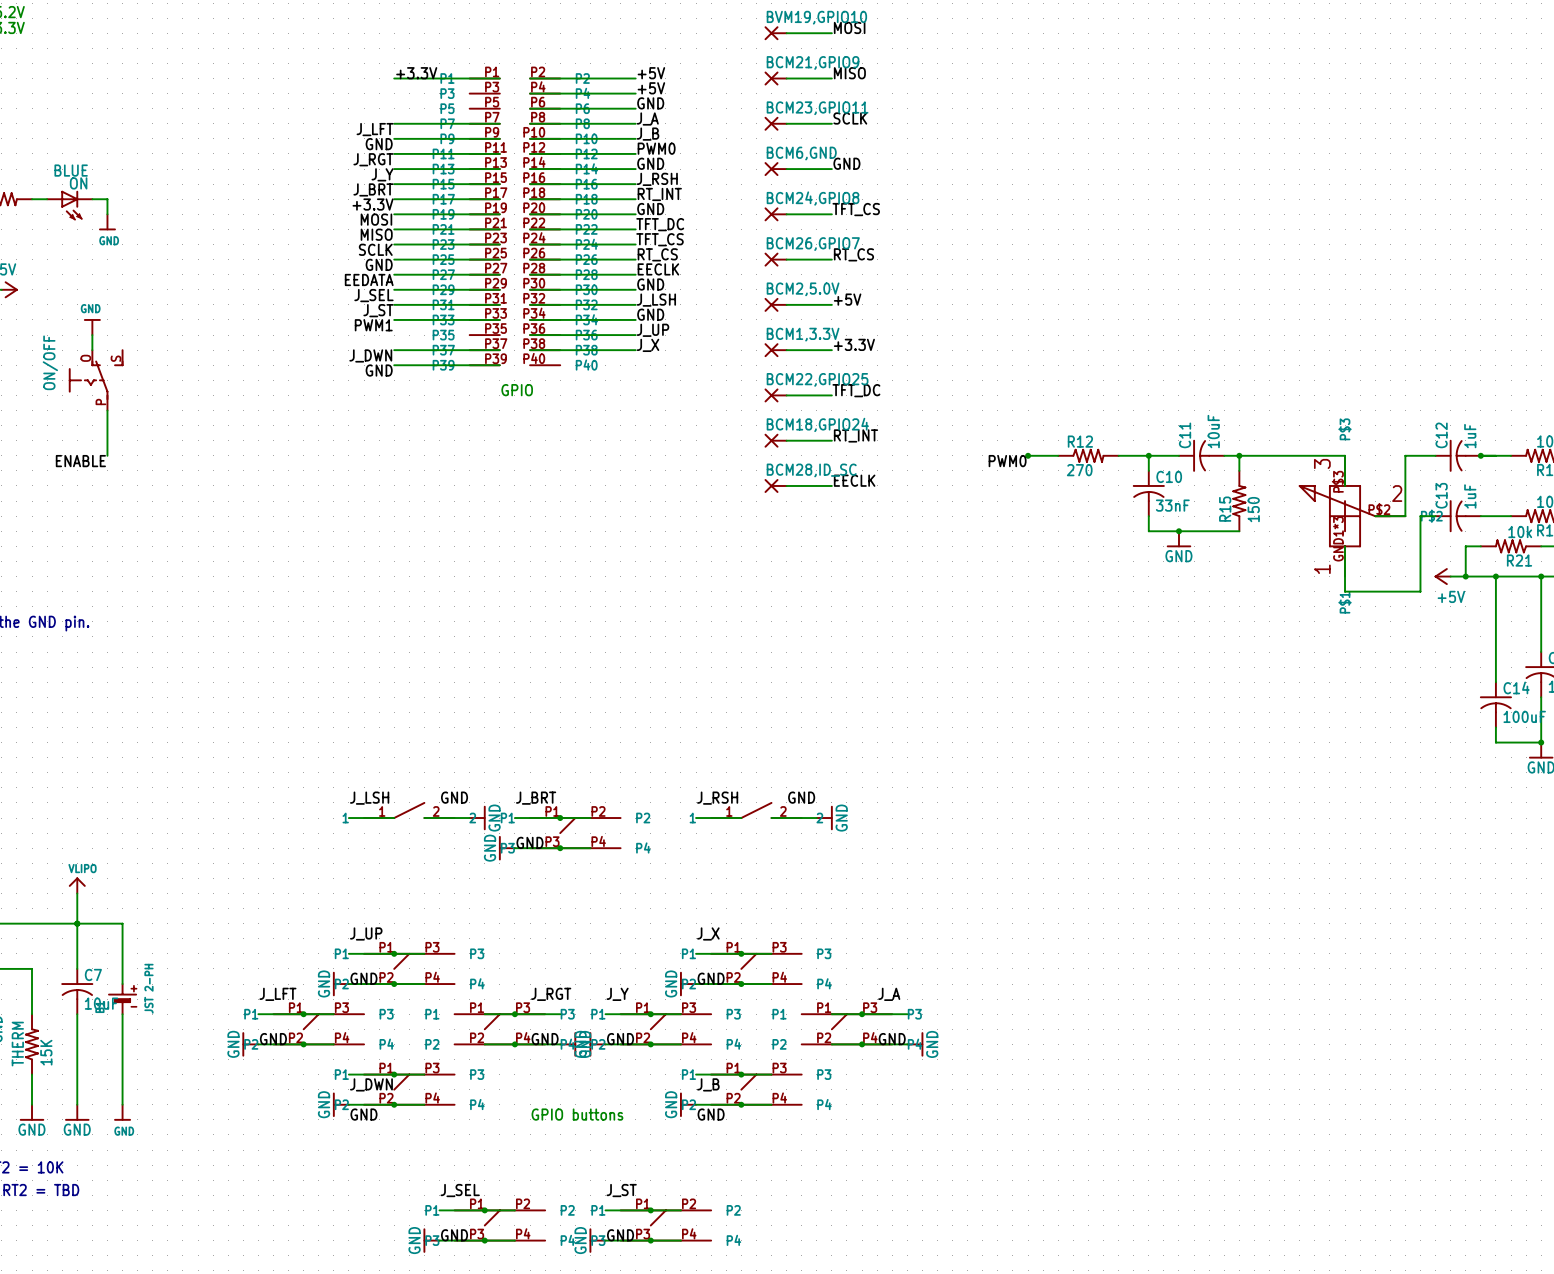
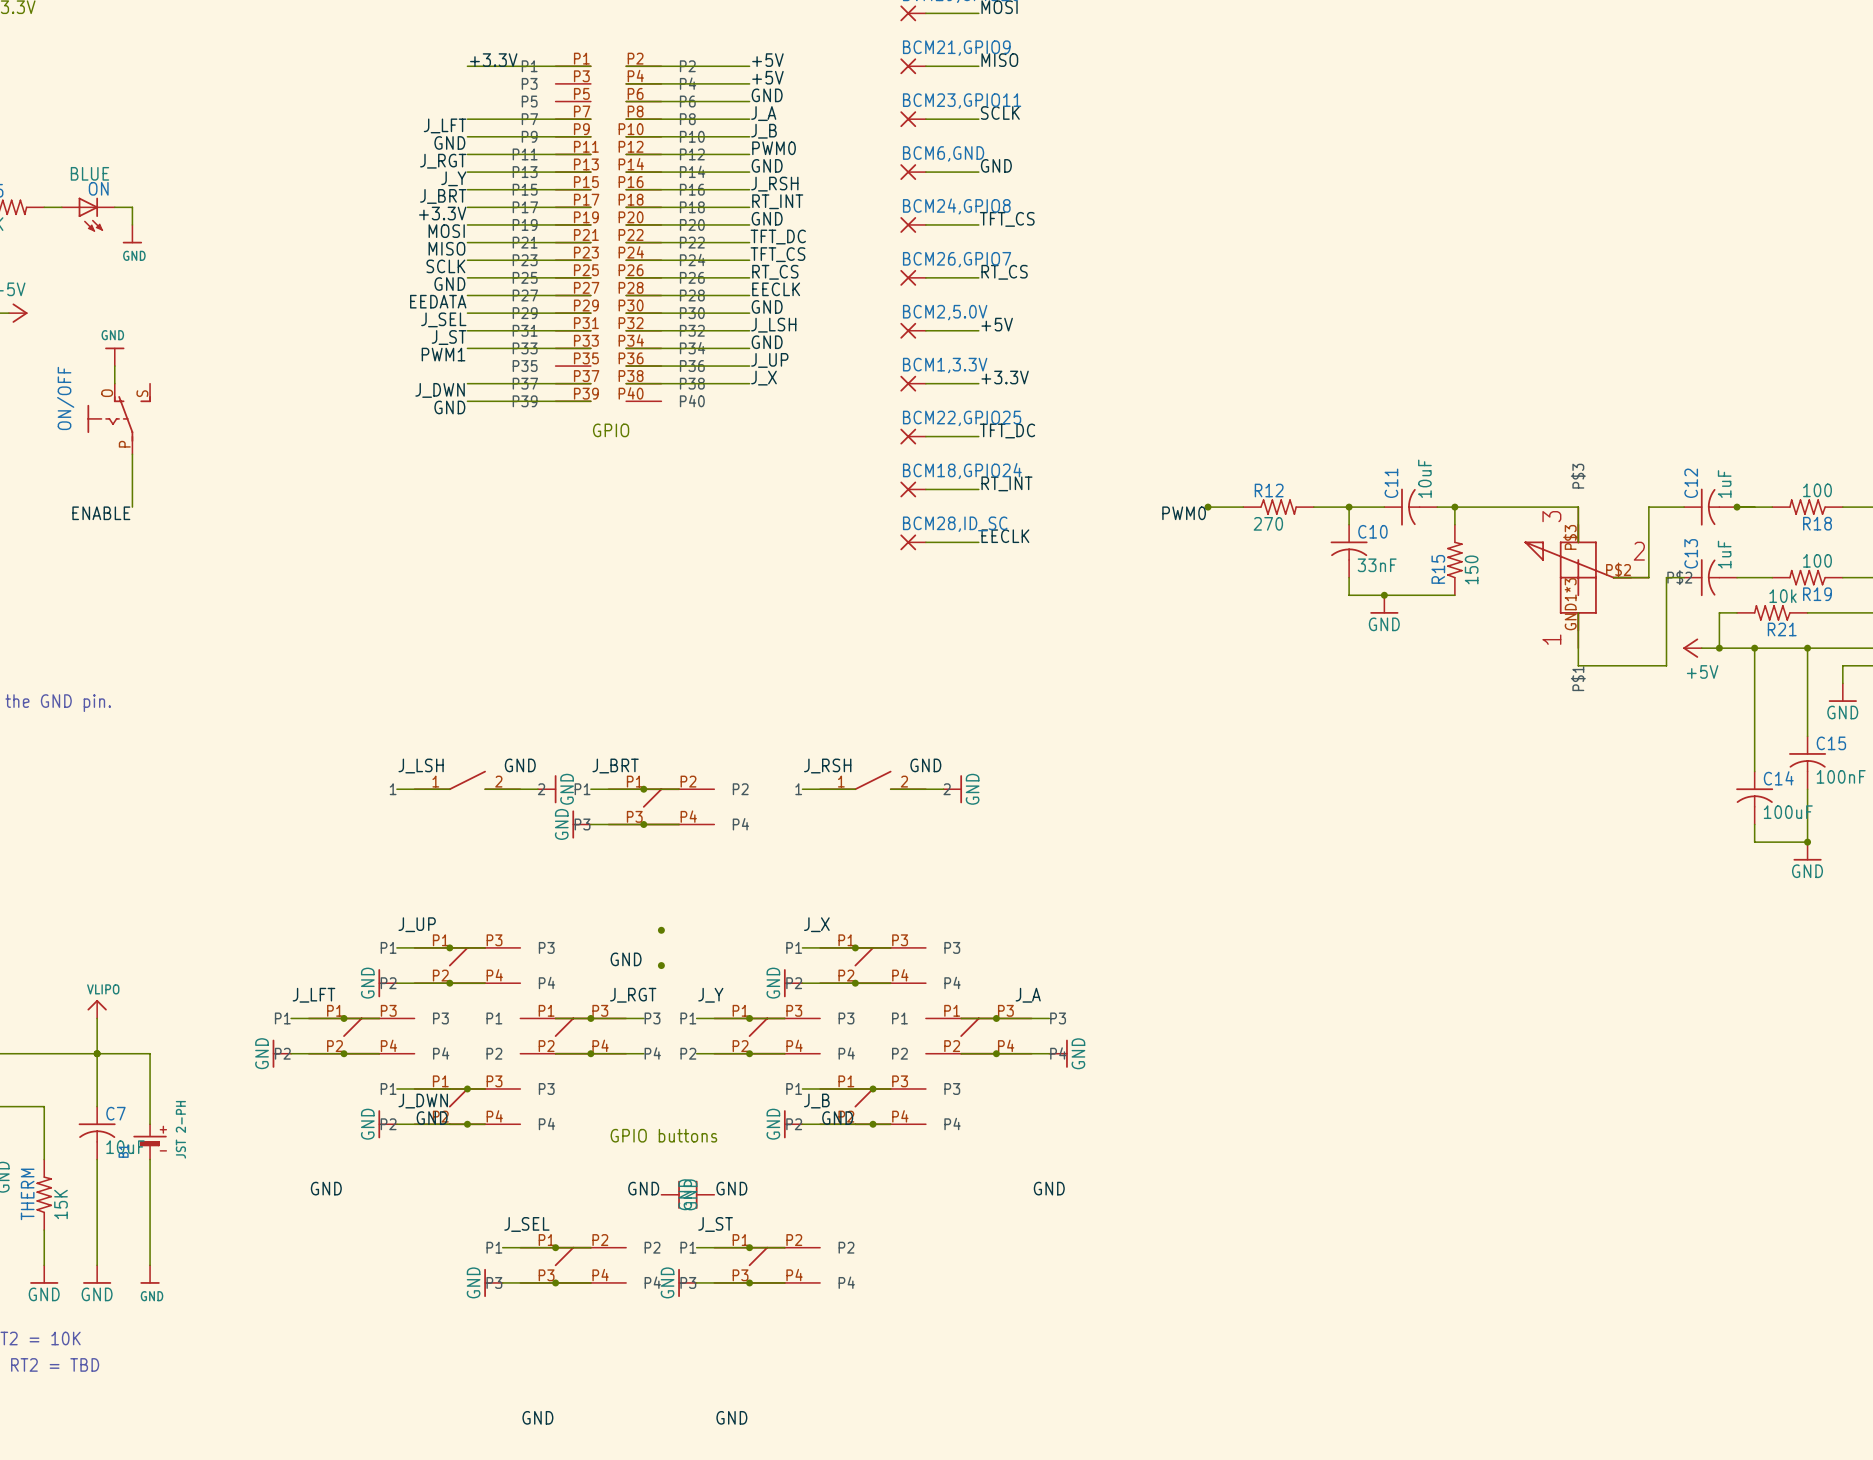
power symbol: none -> GND (547, 789)
junction: none -> (643, 789)
power symbol: none -> GND (952, 789)
power symbol: none -> GND (581, 824)
junction: none -> (643, 824)
label position: GND (454, 797) -> GND (520, 765)
label position: GND (801, 797) -> GND (925, 765)
label position: J_LSH (369, 798) -> J_LSH (421, 766)
label position: J_BRT (536, 798) -> J_BRT (615, 766)
label position: J_RSH (717, 798) -> J_RSH (827, 766)
part position: (409, 810) -> (467, 780)
part position: (756, 810) -> (873, 780)
wire: (348, 818) (394, 818) -> (396, 789) (449, 789)
wire: (424, 818) (469, 818) -> (485, 789) (537, 789)
power symbol: GND (477, 818) -> none
wire: (514, 818) (590, 818) -> (590, 789) (679, 789)
wire: (696, 818) (741, 818) -> (802, 789) (855, 789)
wire: (771, 818) (816, 818) -> (890, 789) (943, 789)
power symbol: GND (824, 818) -> none
wire: none -> (396, 947) (485, 947)
junction: none -> (449, 947)
part position: (575, 833) -> (661, 806)
wire: none -> (802, 947) (890, 947)
junction: none -> (855, 947)
part: none -> (467, 965)
power symbol: GND (507, 848) -> none
wire: (514, 848) (590, 848) -> (590, 824) (679, 824)
part: none -> (873, 965)
power symbol: none -> GND (387, 983)
wire: none -> (396, 983) (485, 983)
junction: none -> (449, 983)
power symbol: none -> GND (793, 983)
wire: none -> (802, 983) (890, 983)
junction: none -> (855, 983)
junction: none -> (344, 1018)
junction: none -> (590, 1018)
junction: none -> (749, 1018)
junction: none -> (996, 1018)
part: none -> (361, 1036)
part: none -> (573, 1036)
part: none -> (767, 1036)
part: none -> (978, 1036)
power symbol: none -> GND (281, 1053)
junction: none -> (344, 1053)
junction: none -> (590, 1053)
junction: none -> (749, 1053)
junction: none -> (996, 1053)
power symbol: none -> GND (1058, 1053)
label position: J_UP (366, 933) -> J_UP (417, 924)
label position: J_X (708, 933) -> J_X (816, 924)
part position: (409, 968) -> (467, 1106)
part position: (756, 968) -> (873, 1106)
power symbol position: GND (341, 984) -> GND (387, 1124)
power symbol position: GND (688, 984) -> GND (793, 1124)
label position: J_LFT (277, 994) -> J_LFT (313, 995)
label position: J_RGT (551, 994) -> J_RGT (633, 995)
label position: J_Y (617, 994) -> J_Y (710, 995)
label position: J_A (889, 994) -> J_A (1028, 995)
wire: (258, 1014) (333, 1014) -> (291, 1018) (379, 1018)
junction: (303, 1014) -> none
wire: (484, 1014) (560, 1014) -> (555, 1018) (643, 1018)
junction: (514, 1014) -> none
wire: (605, 1014) (680, 1014) -> (696, 1018) (784, 1018)
junction: (650, 1014) -> none
wire: (831, 1014) (907, 1014) -> (961, 1018) (1049, 1018)
junction: (862, 1014) -> none
part: (318, 1029) -> none
part: (499, 1029) -> none
part: (665, 1029) -> none
part: (846, 1029) -> none
power symbol: GND (250, 1044) -> none
wire: (258, 1044) (333, 1044) -> (291, 1053) (379, 1053)
junction: (303, 1044) -> none
wire: (484, 1044) (560, 1044) -> (555, 1053) (643, 1053)
junction: (514, 1044) -> none
wire: (605, 1044) (680, 1044) -> (696, 1053) (784, 1053)
junction: (650, 1044) -> none
wire: (831, 1044) (907, 1044) -> (961, 1053) (1049, 1053)
junction: (862, 1044) -> none
power symbol: GND (915, 1044) -> none
wire: (348, 1074) (424, 1074) -> none
junction: (394, 1074) -> none
wire: (696, 1074) (771, 1074) -> none
junction: (741, 1074) -> none
label position: J_DWN (371, 1084) -> J_DWN (423, 1101)
label position: J_B (708, 1084) -> J_B (816, 1101)
part: (409, 1089) -> none
junction: none -> (555, 1247)
junction: none -> (749, 1247)
part: (756, 1089) -> none
power symbol: GND (341, 1104) -> none
wire: (348, 1104) (424, 1104) -> none
junction: (394, 1104) -> none
part: none -> (573, 1265)
part: none -> (767, 1265)
power symbol: GND (688, 1104) -> none
wire: (696, 1104) (771, 1104) -> none
junction: (741, 1104) -> none
label: GND (363, 1114) -> none
text position: GPIO buttons (577, 1114) -> GPIO buttons (663, 1135)
label: GND (711, 1114) -> none
power symbol: none -> GND (493, 1282)
junction: none -> (555, 1282)
power symbol: none -> GND (687, 1282)
junction: none -> (749, 1282)
label position: J_SEL (460, 1190) -> J_SEL (526, 1224)
label position: J_ST (621, 1190) -> J_ST (715, 1224)
wire: (439, 1210) (514, 1210) -> (502, 1247) (590, 1247)
junction: (484, 1210) -> none
wire: (605, 1210) (680, 1210) -> (696, 1247) (784, 1247)
junction: (650, 1210) -> none
part: (499, 1225) -> none
part: (665, 1225) -> none
power symbol: GND (431, 1240) -> none
wire: (439, 1240) (514, 1240) -> (502, 1282) (590, 1282)
junction: (484, 1240) -> none
power symbol: GND (597, 1240) -> none
wire: (605, 1240) (680, 1240) -> (696, 1282) (784, 1282)
junction: (650, 1240) -> none

